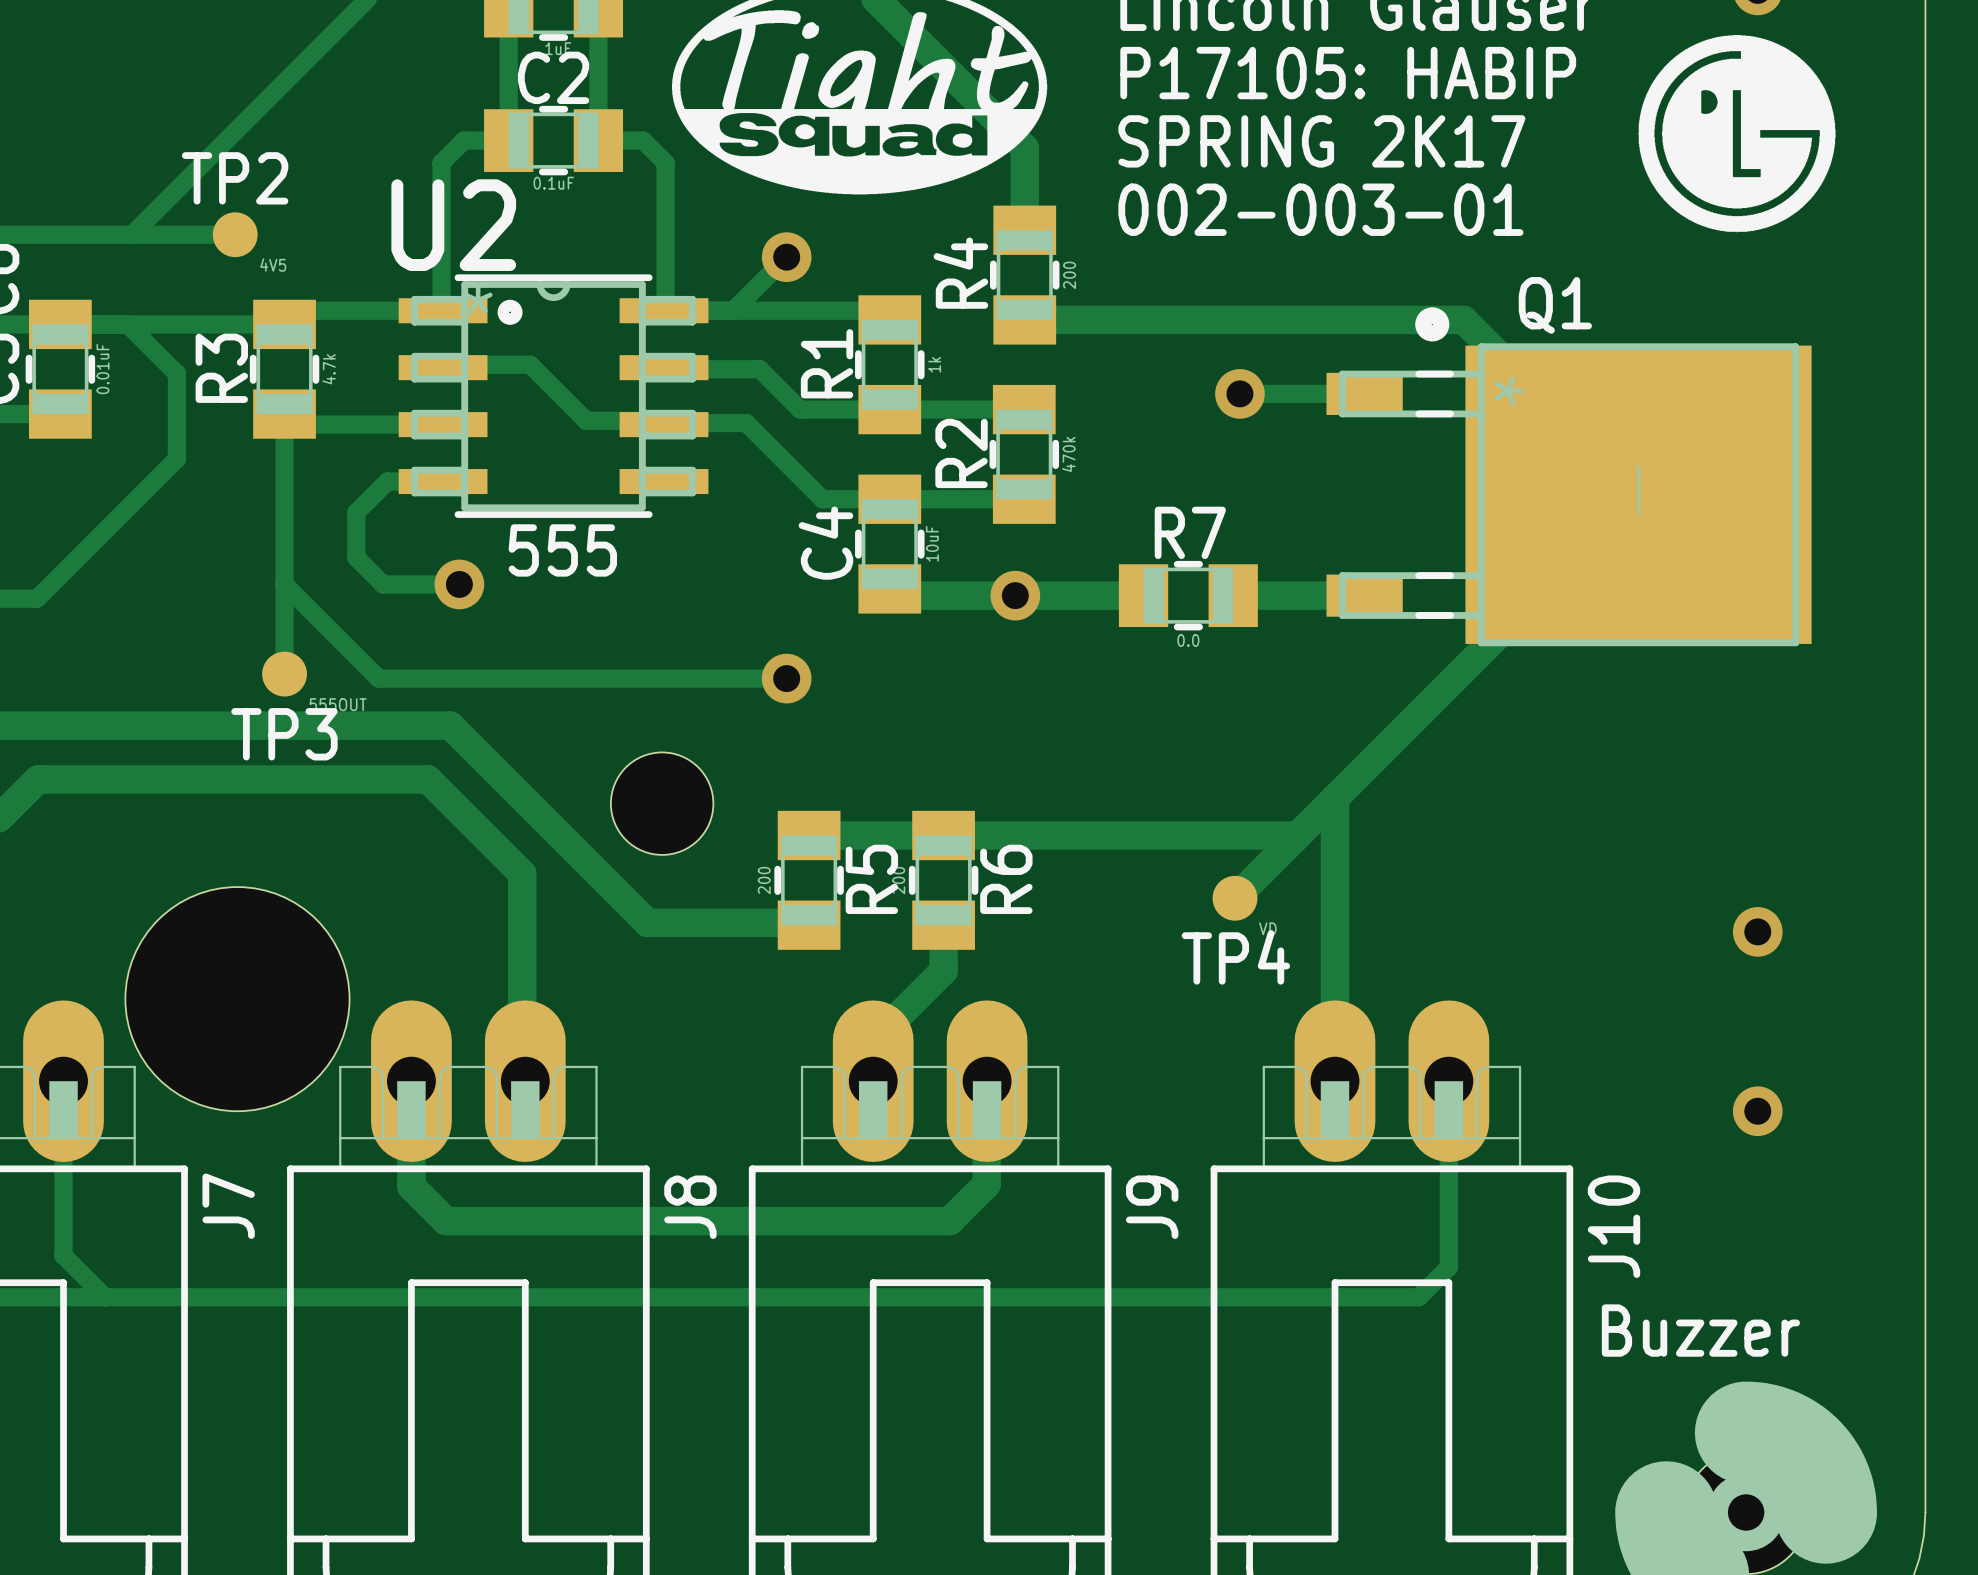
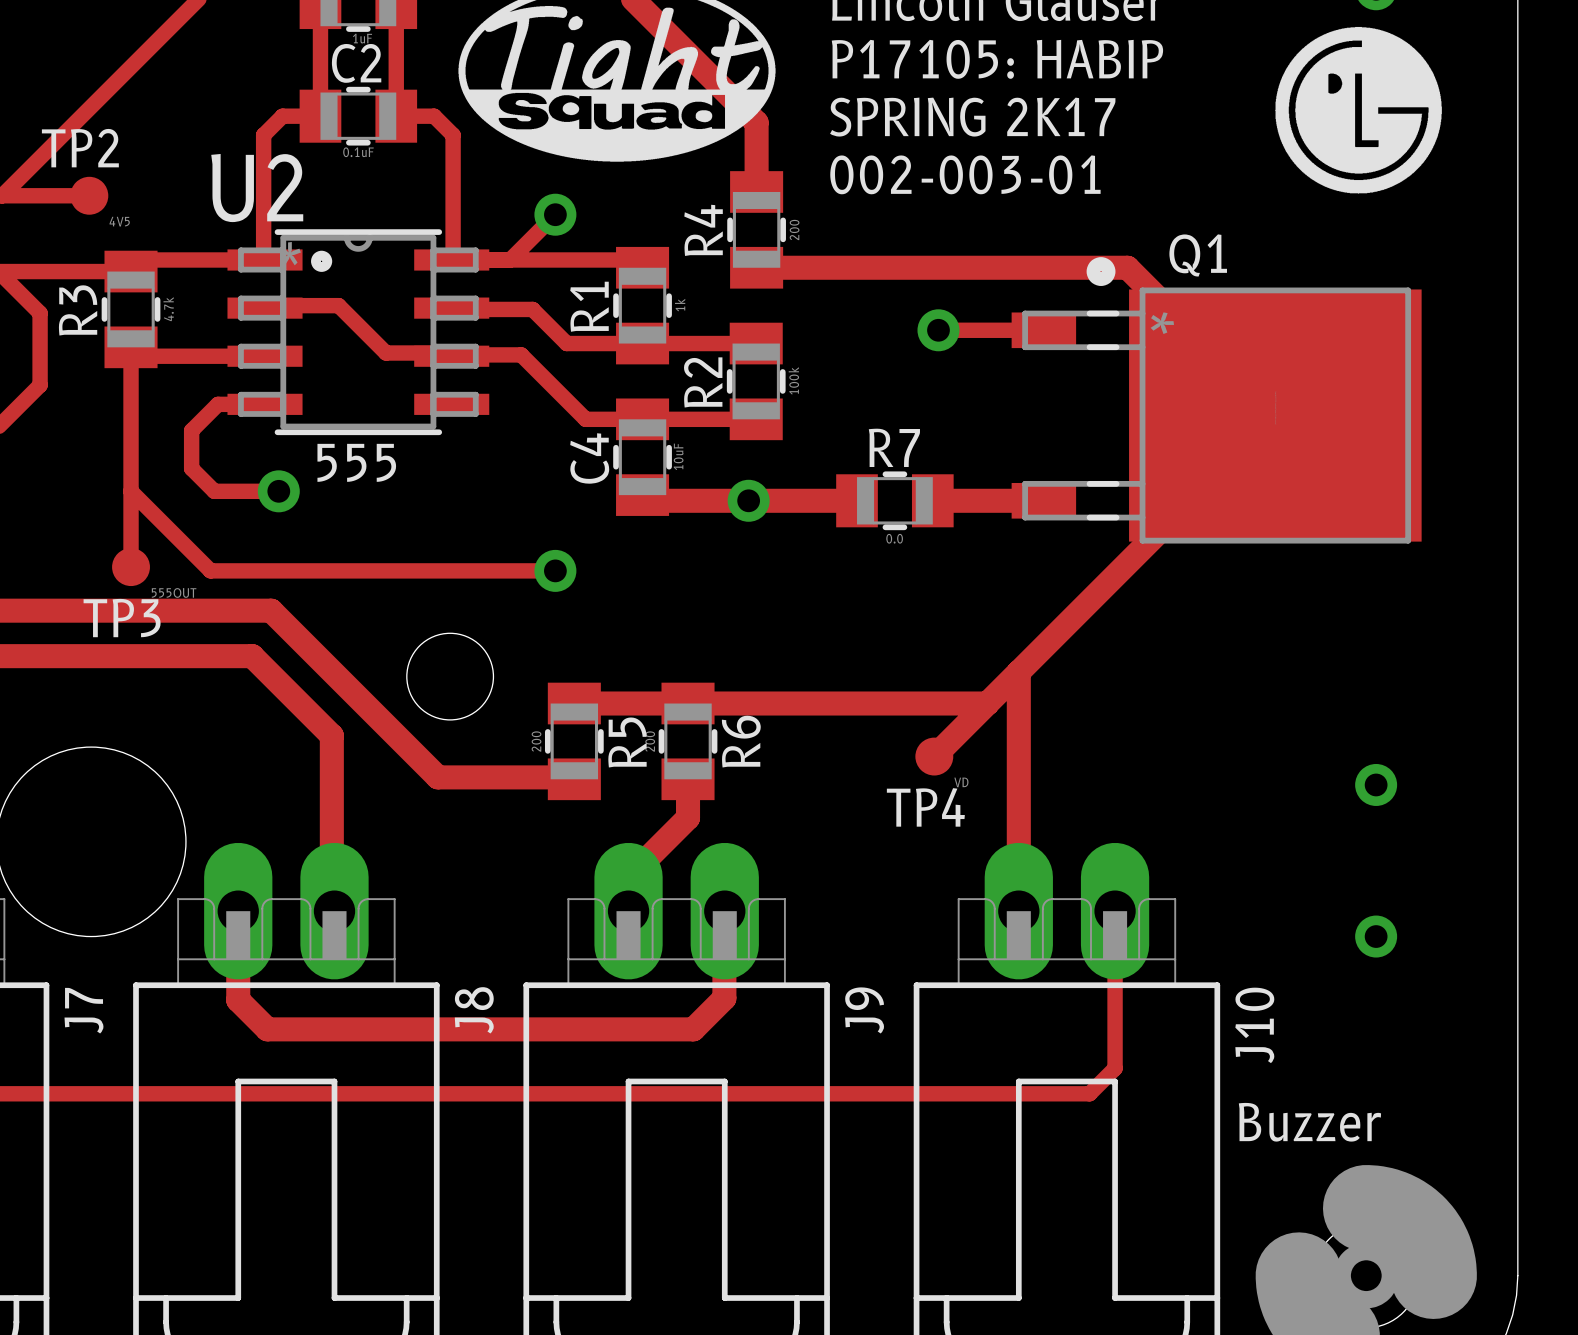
R2 value: 470k (1068, 454) -> 100k (793, 380)

